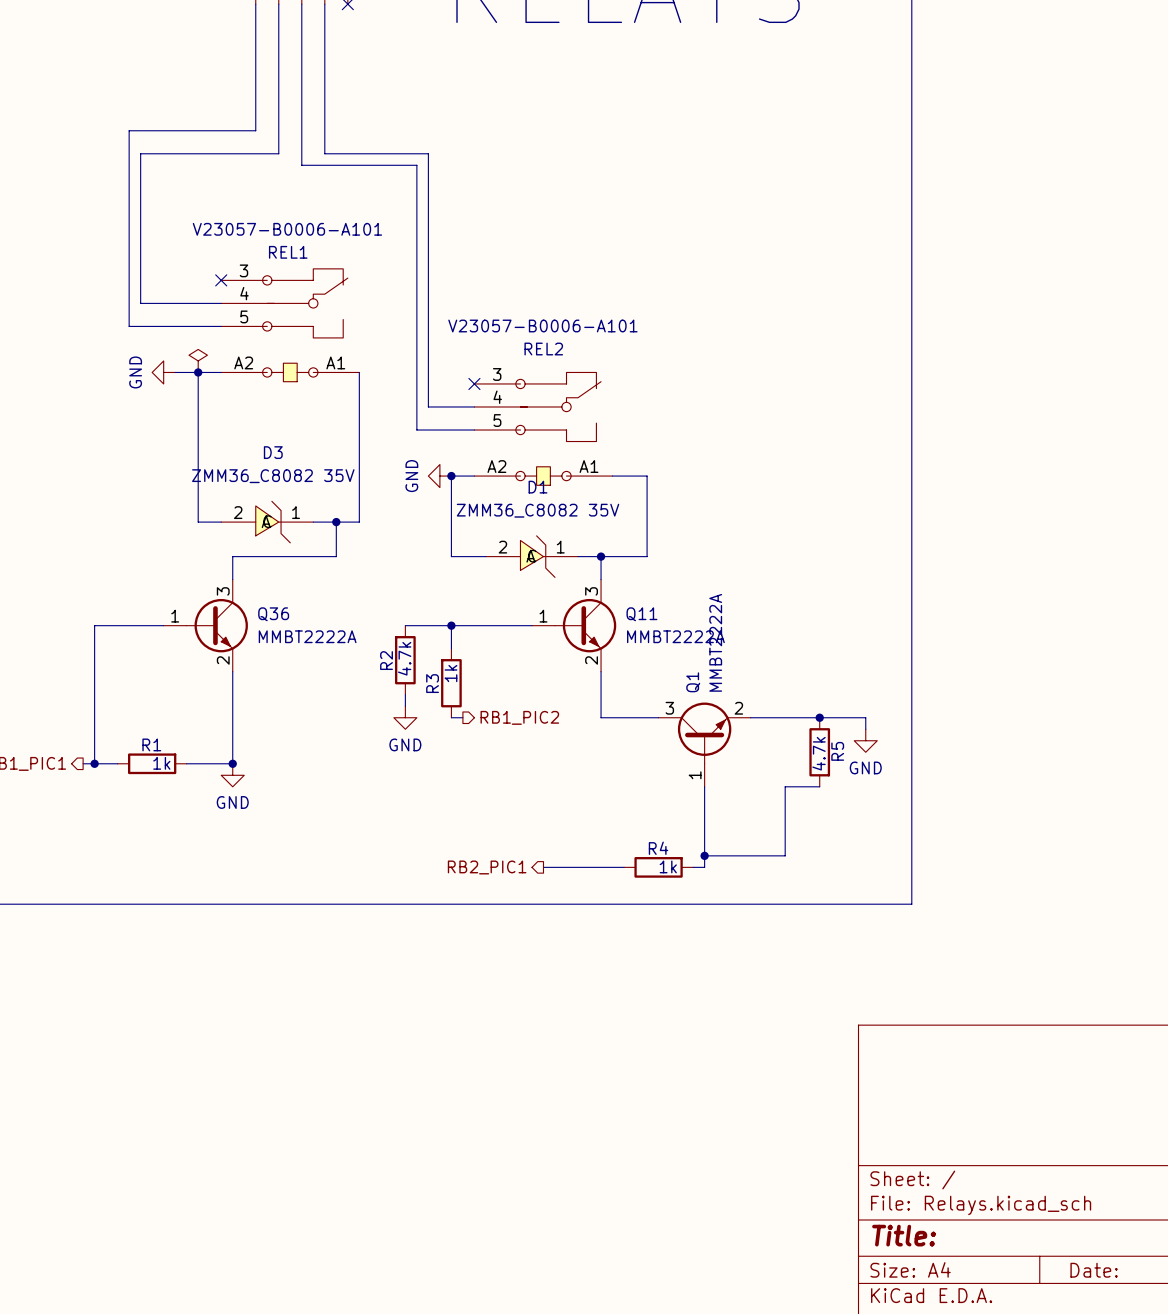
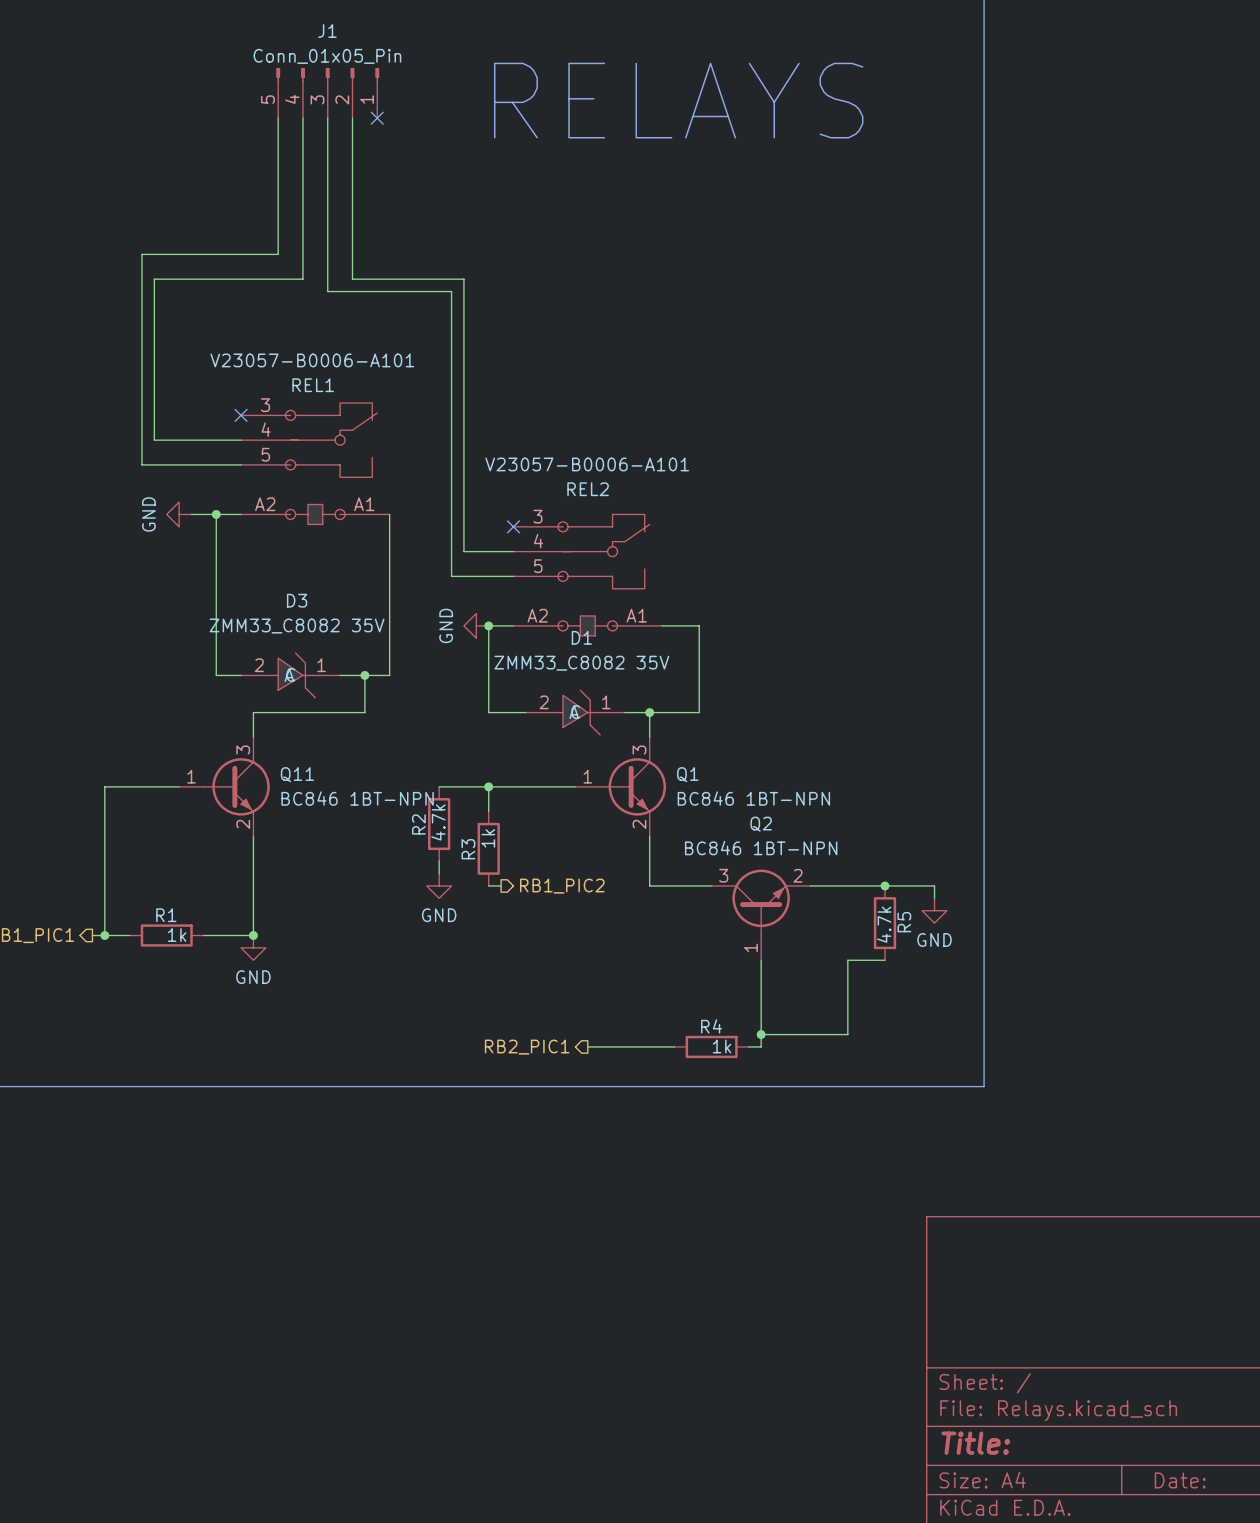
power symbol: (198, 360) -> none
D3 value: ZMM36_C8082 35V (273, 476) -> ZMM33_C8082 35V (297, 626)
D1 value: ZMM36_C8082 35V (538, 510) -> ZMM33_C8082 35V (581, 663)
Q36 name: Q36 (273, 614) -> Q11 (297, 774)
Q11 name: Q11 (641, 614) -> Q1 (687, 774)
Q36 value: MMBT2222A (307, 636) -> BC846 1BT-NPN (357, 798)
Q11 value: MMBT2222A (675, 636) -> BC846 1BT-NPN (753, 798)
Q1 value: MMBT2222A (715, 642) -> BC846 1BT-NPN (761, 848)
Q1 name: Q1 (693, 682) -> Q2 (761, 824)

